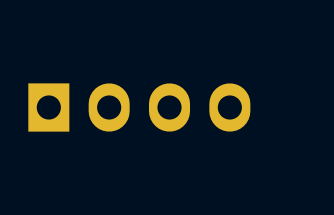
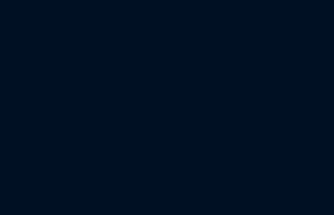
part: (139, 107) -> none

